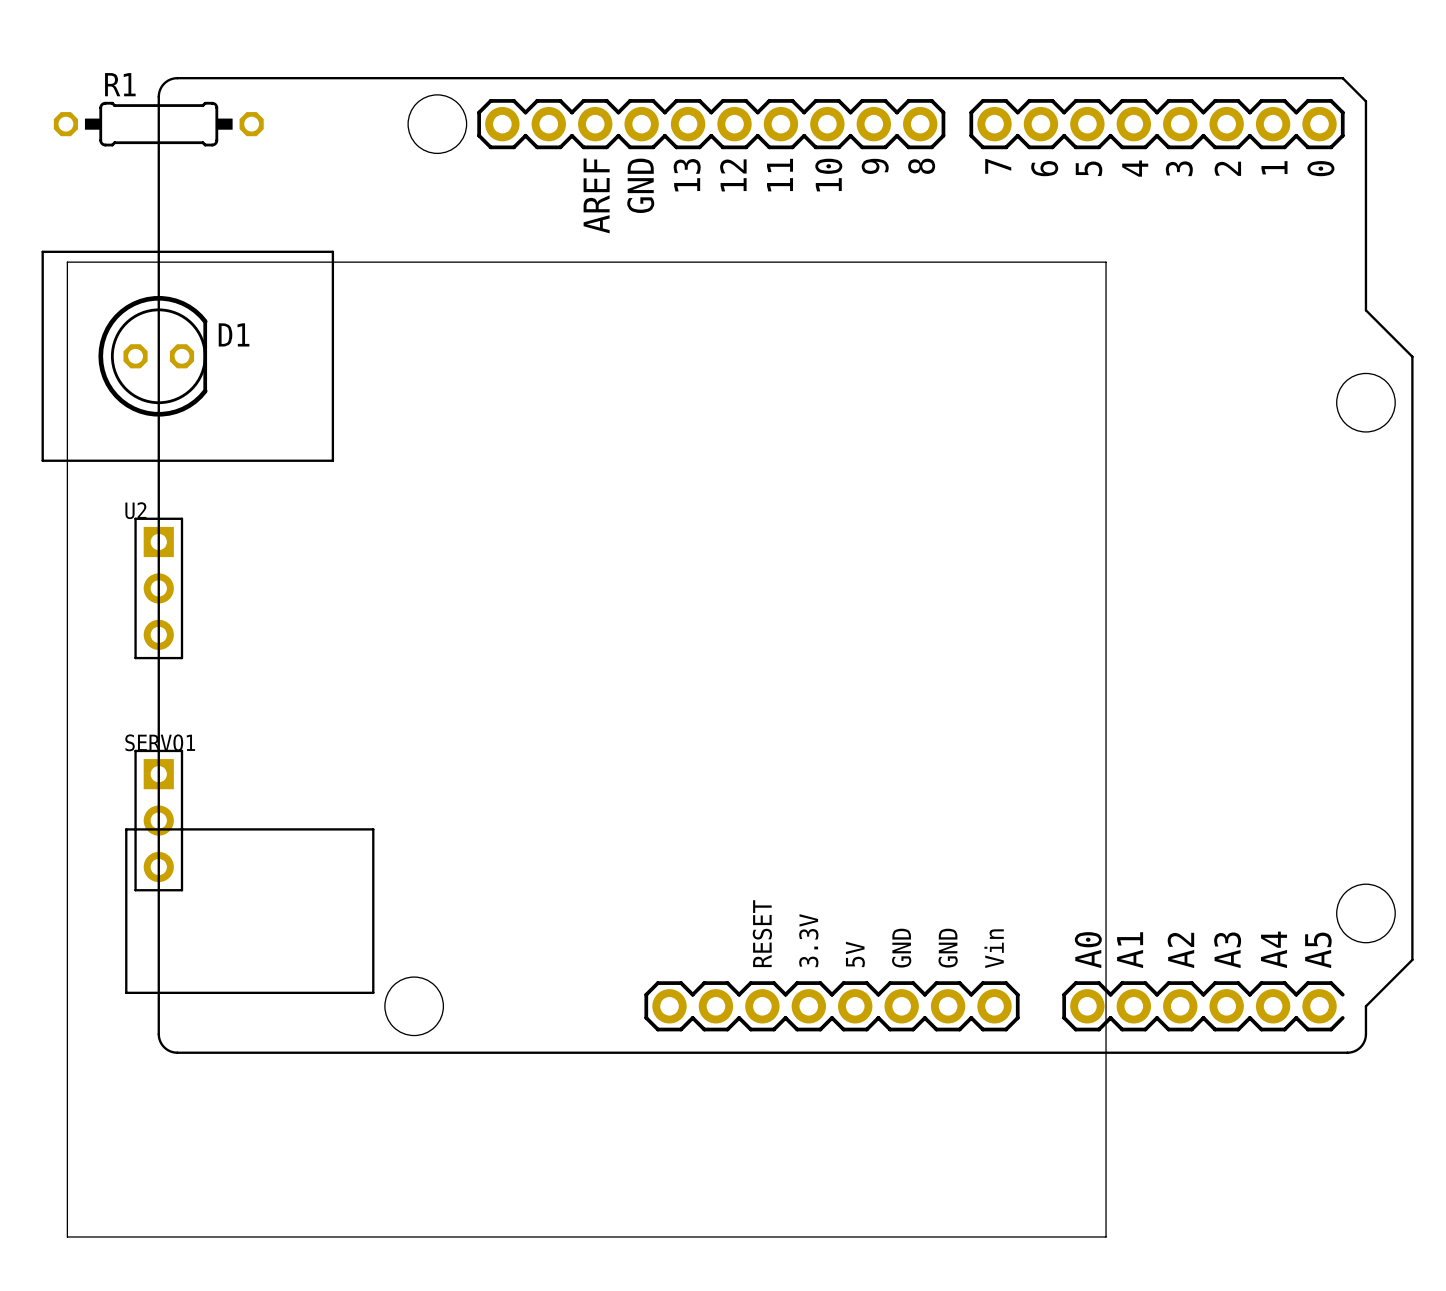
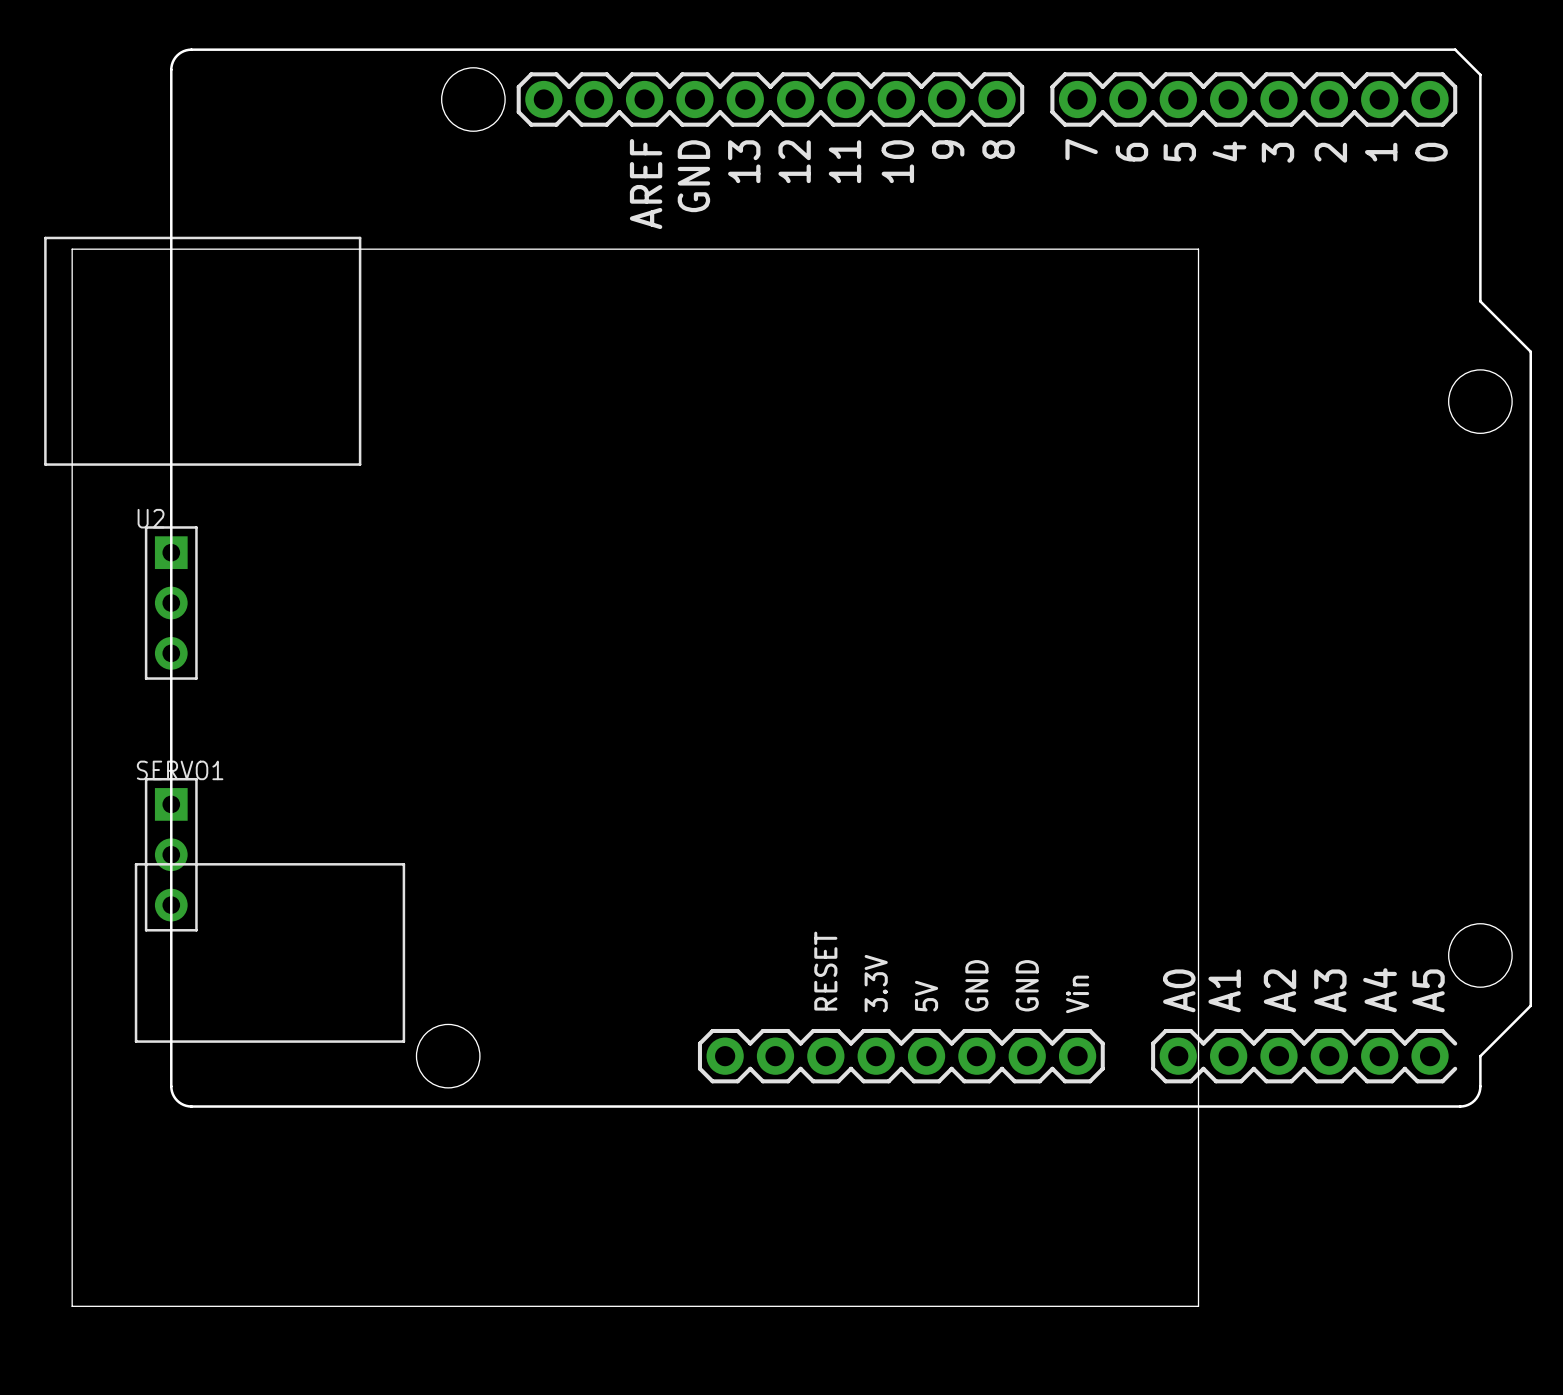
R1: (158, 124) -> none
D1: (152, 356) -> none

